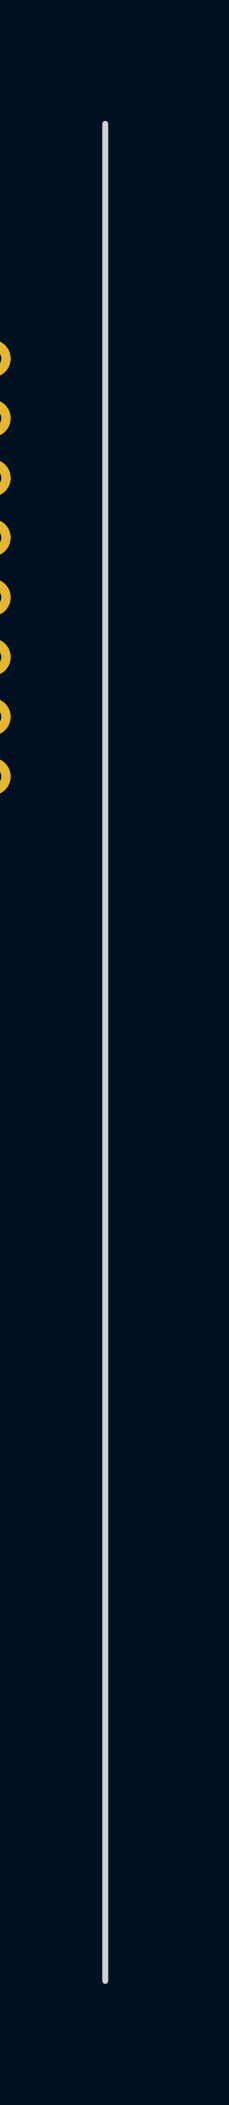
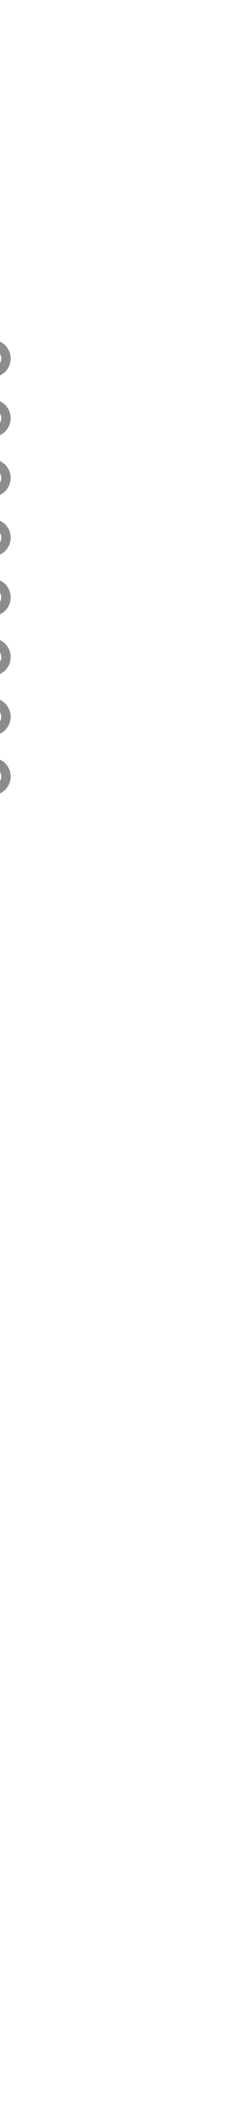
board edge: (105, 123) (105, 1980) -> none

